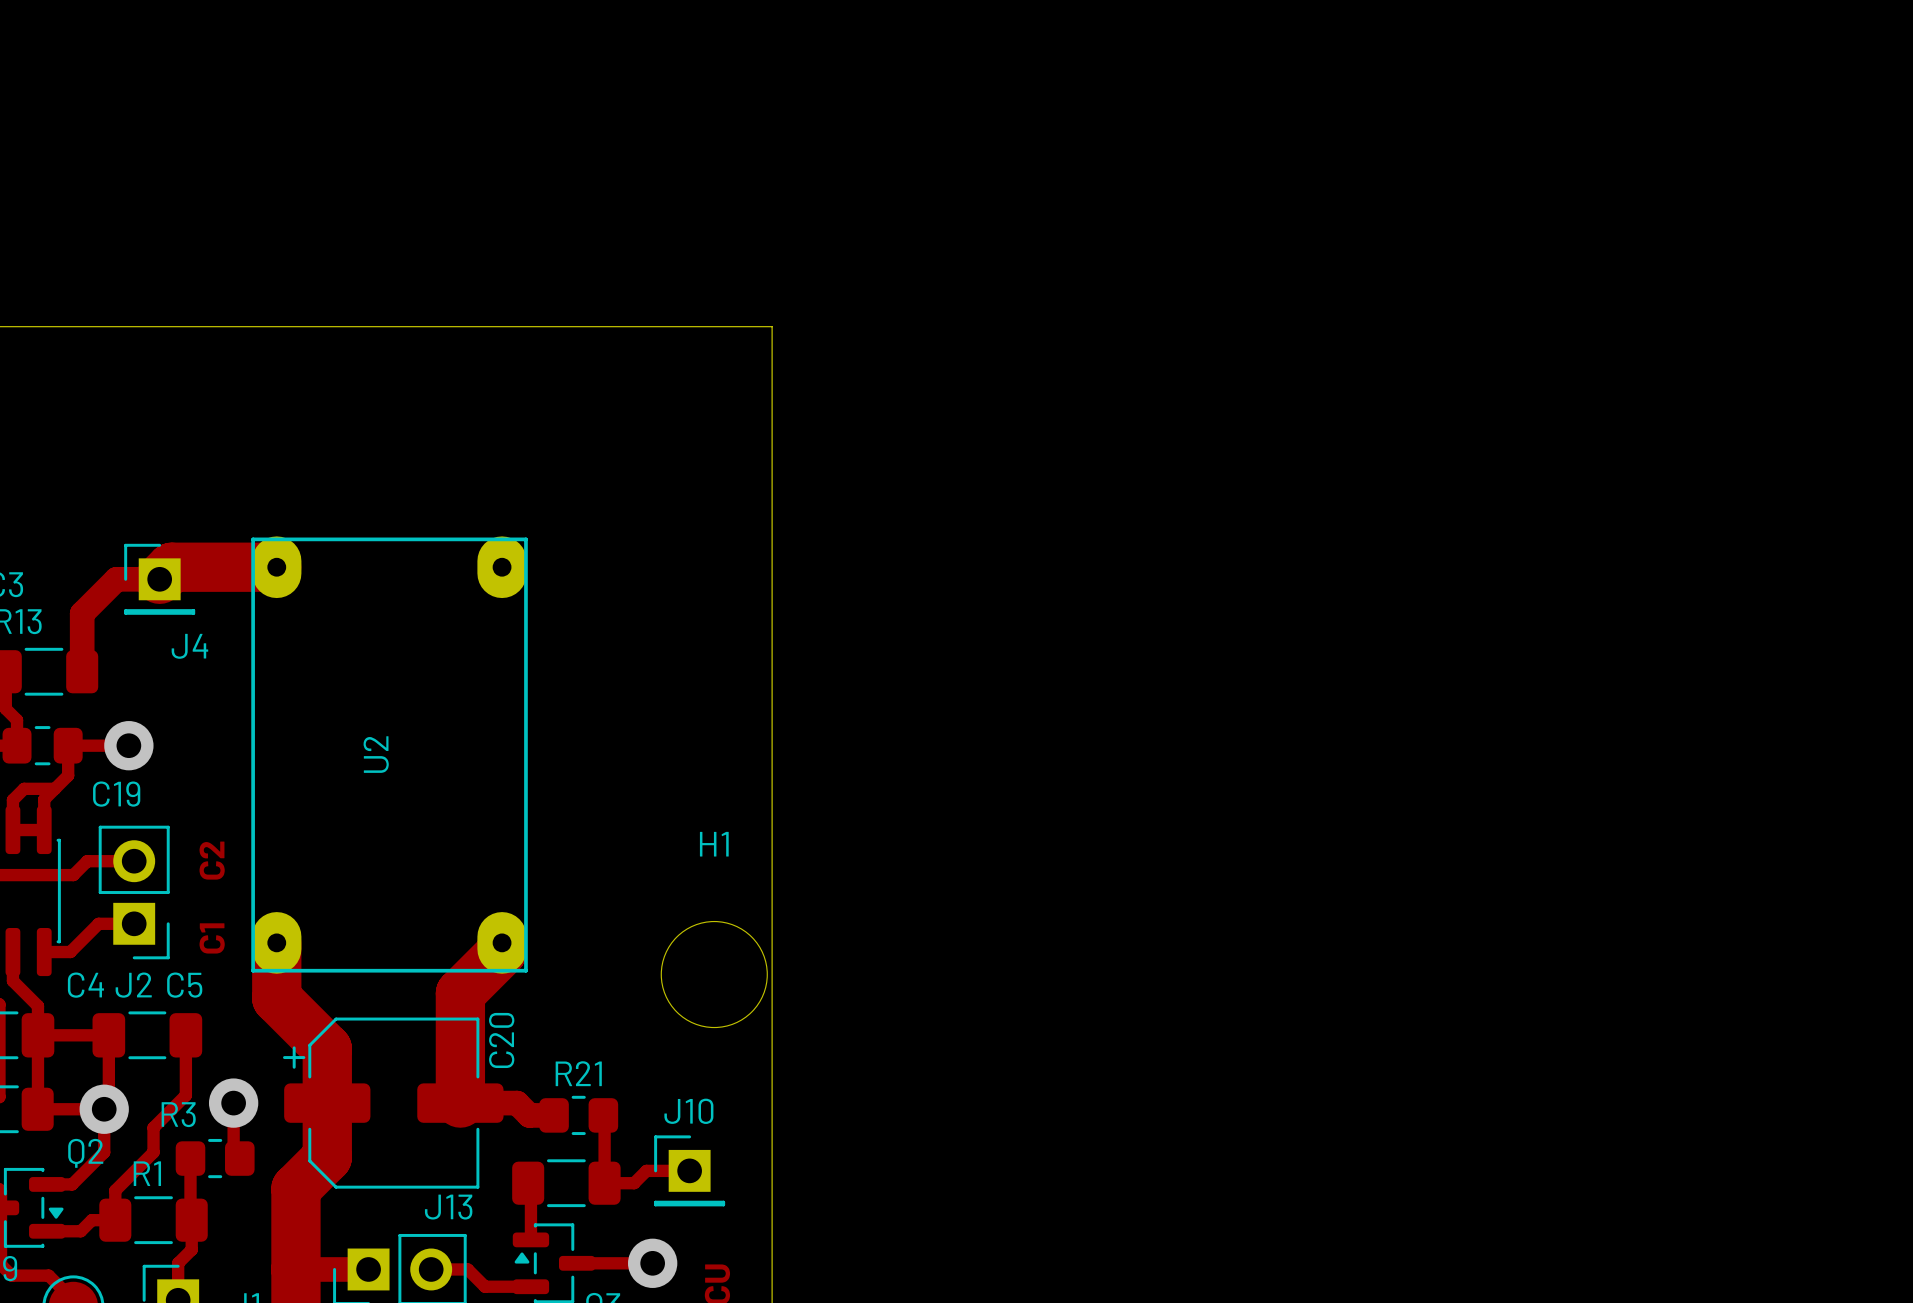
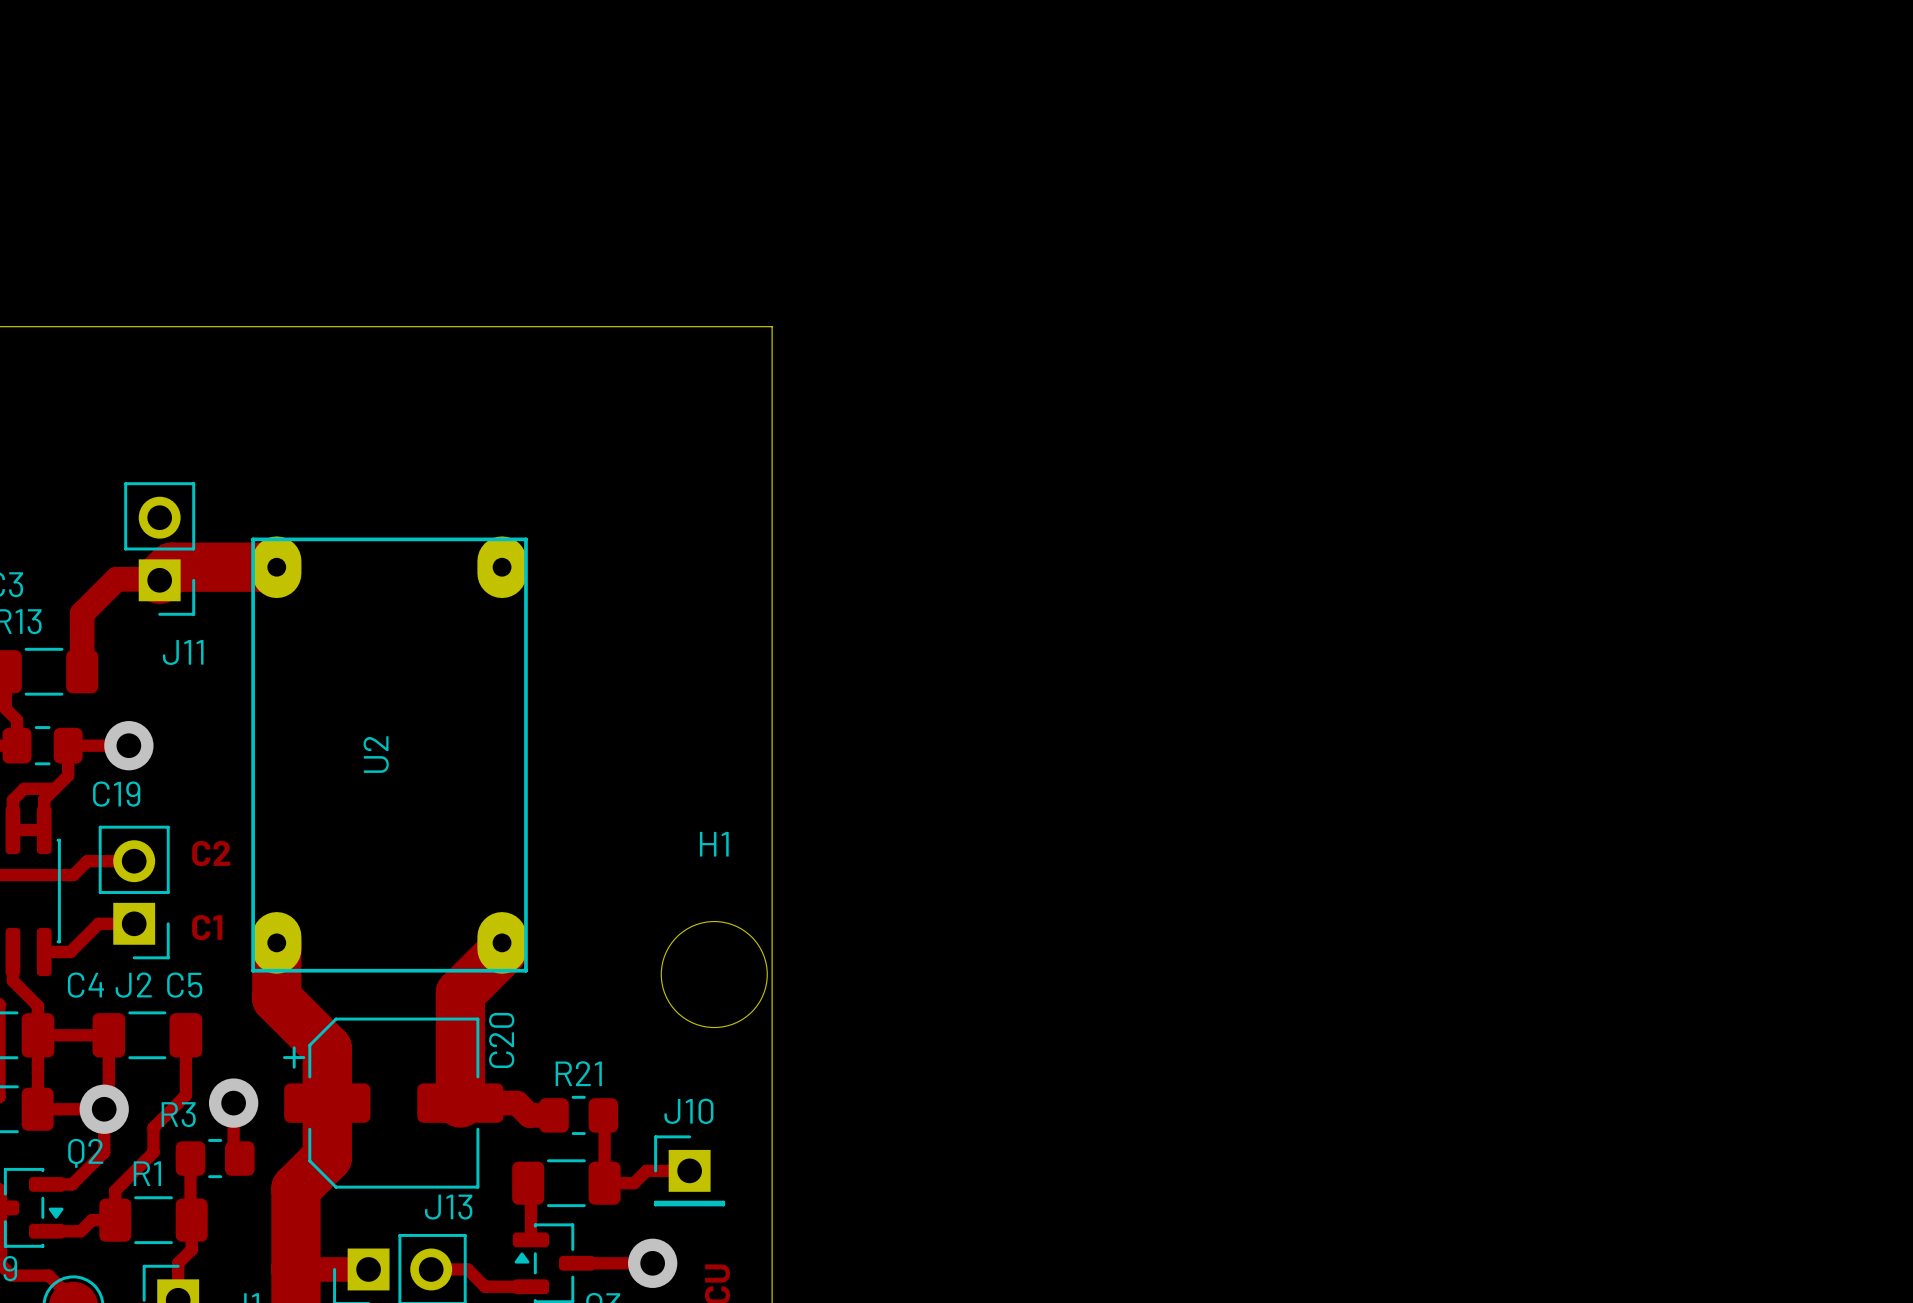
J11: none -> (159, 548)
J4: (159, 579) -> none
text rotation: 0° (212, 860) -> 90° clockwise (211, 853)
text rotation: 0° (212, 938) -> 90° clockwise (207, 927)

